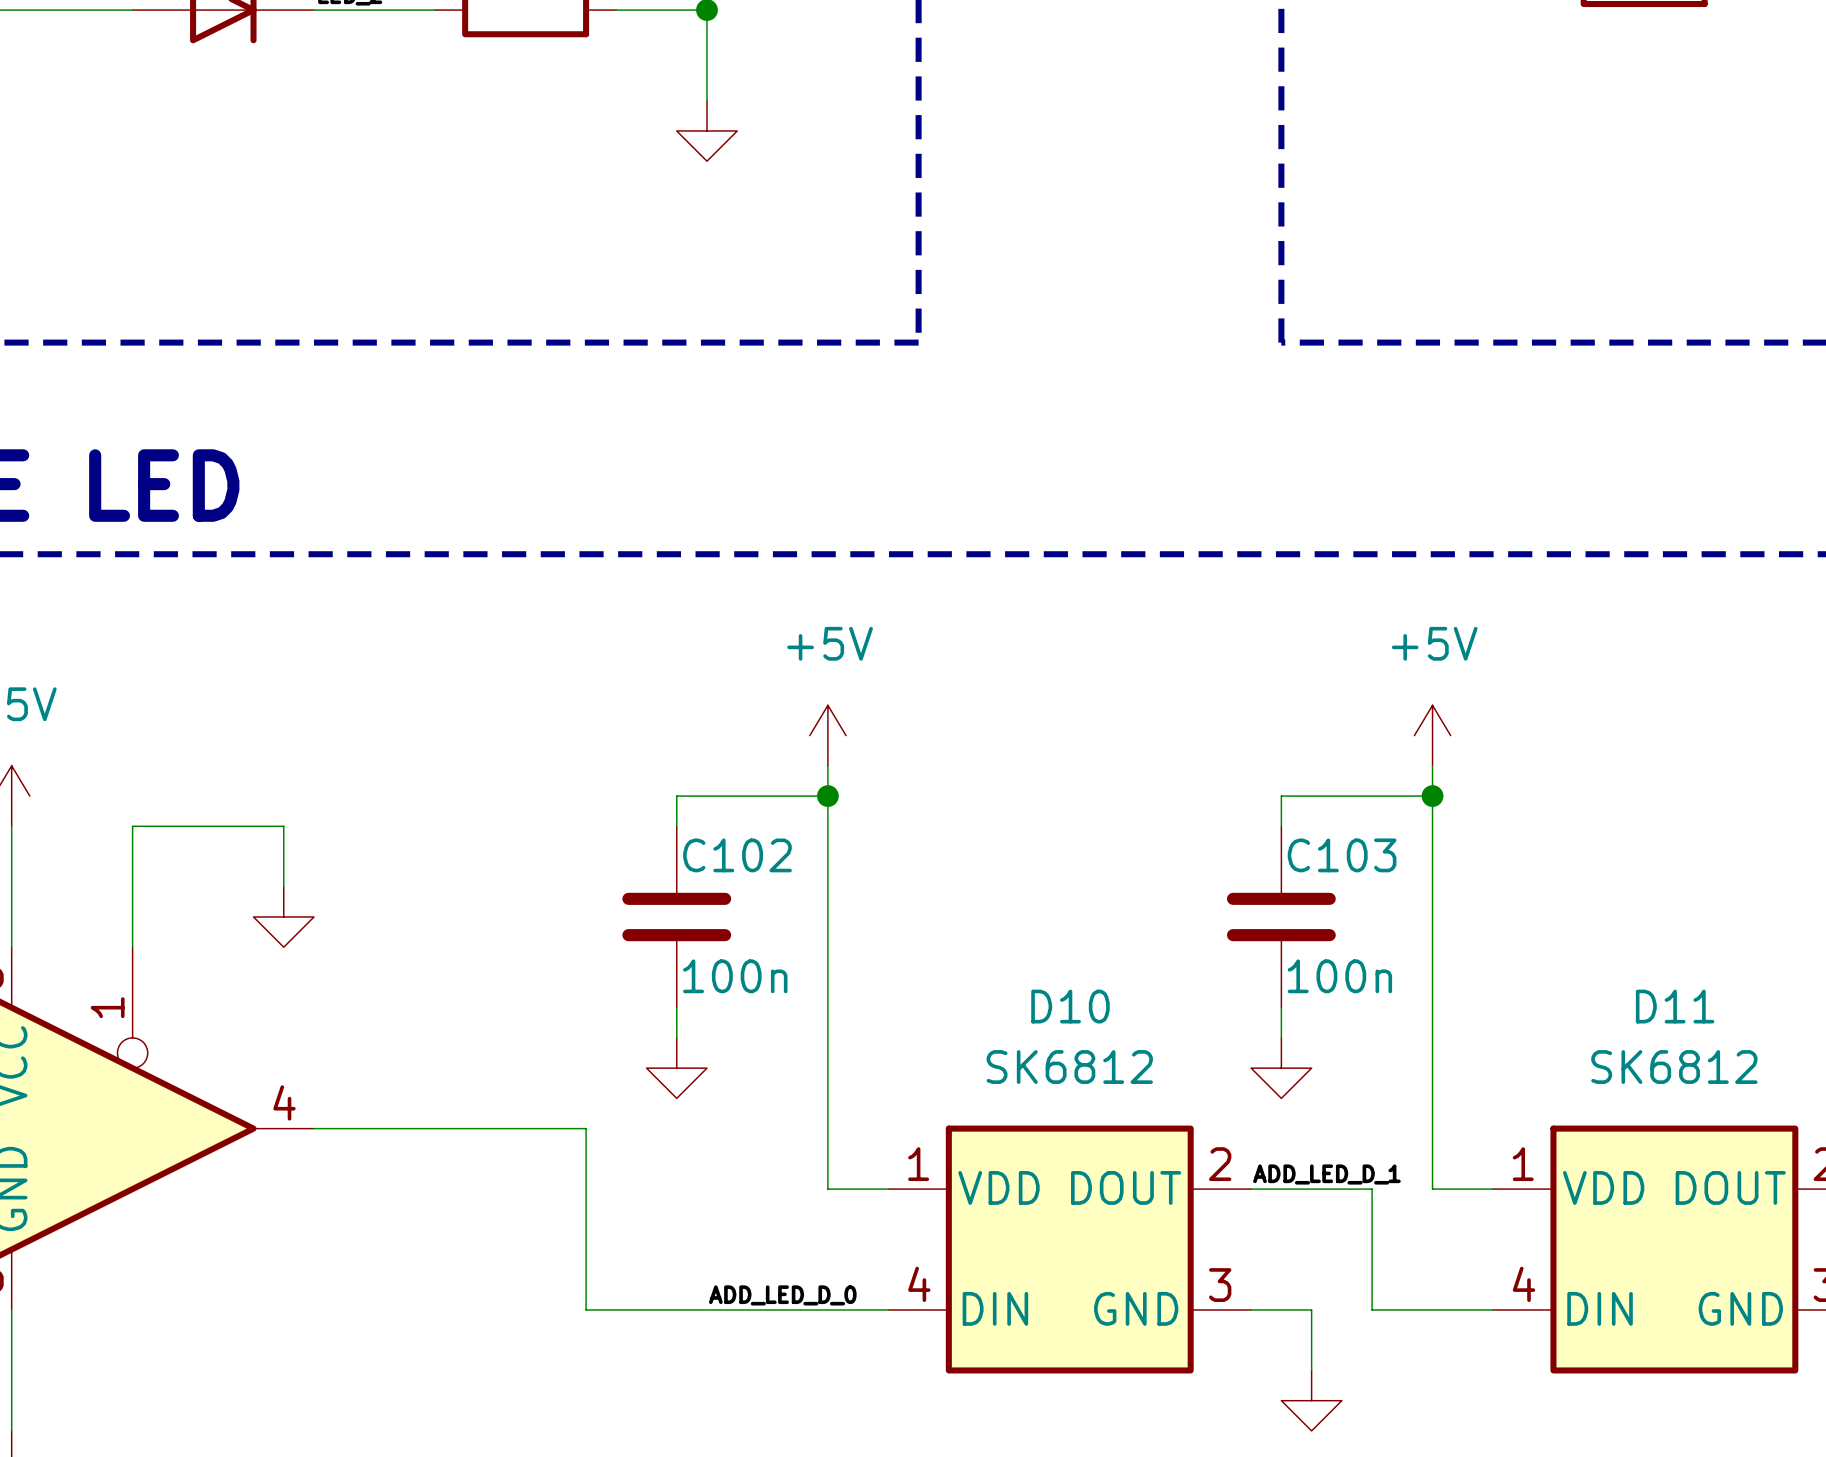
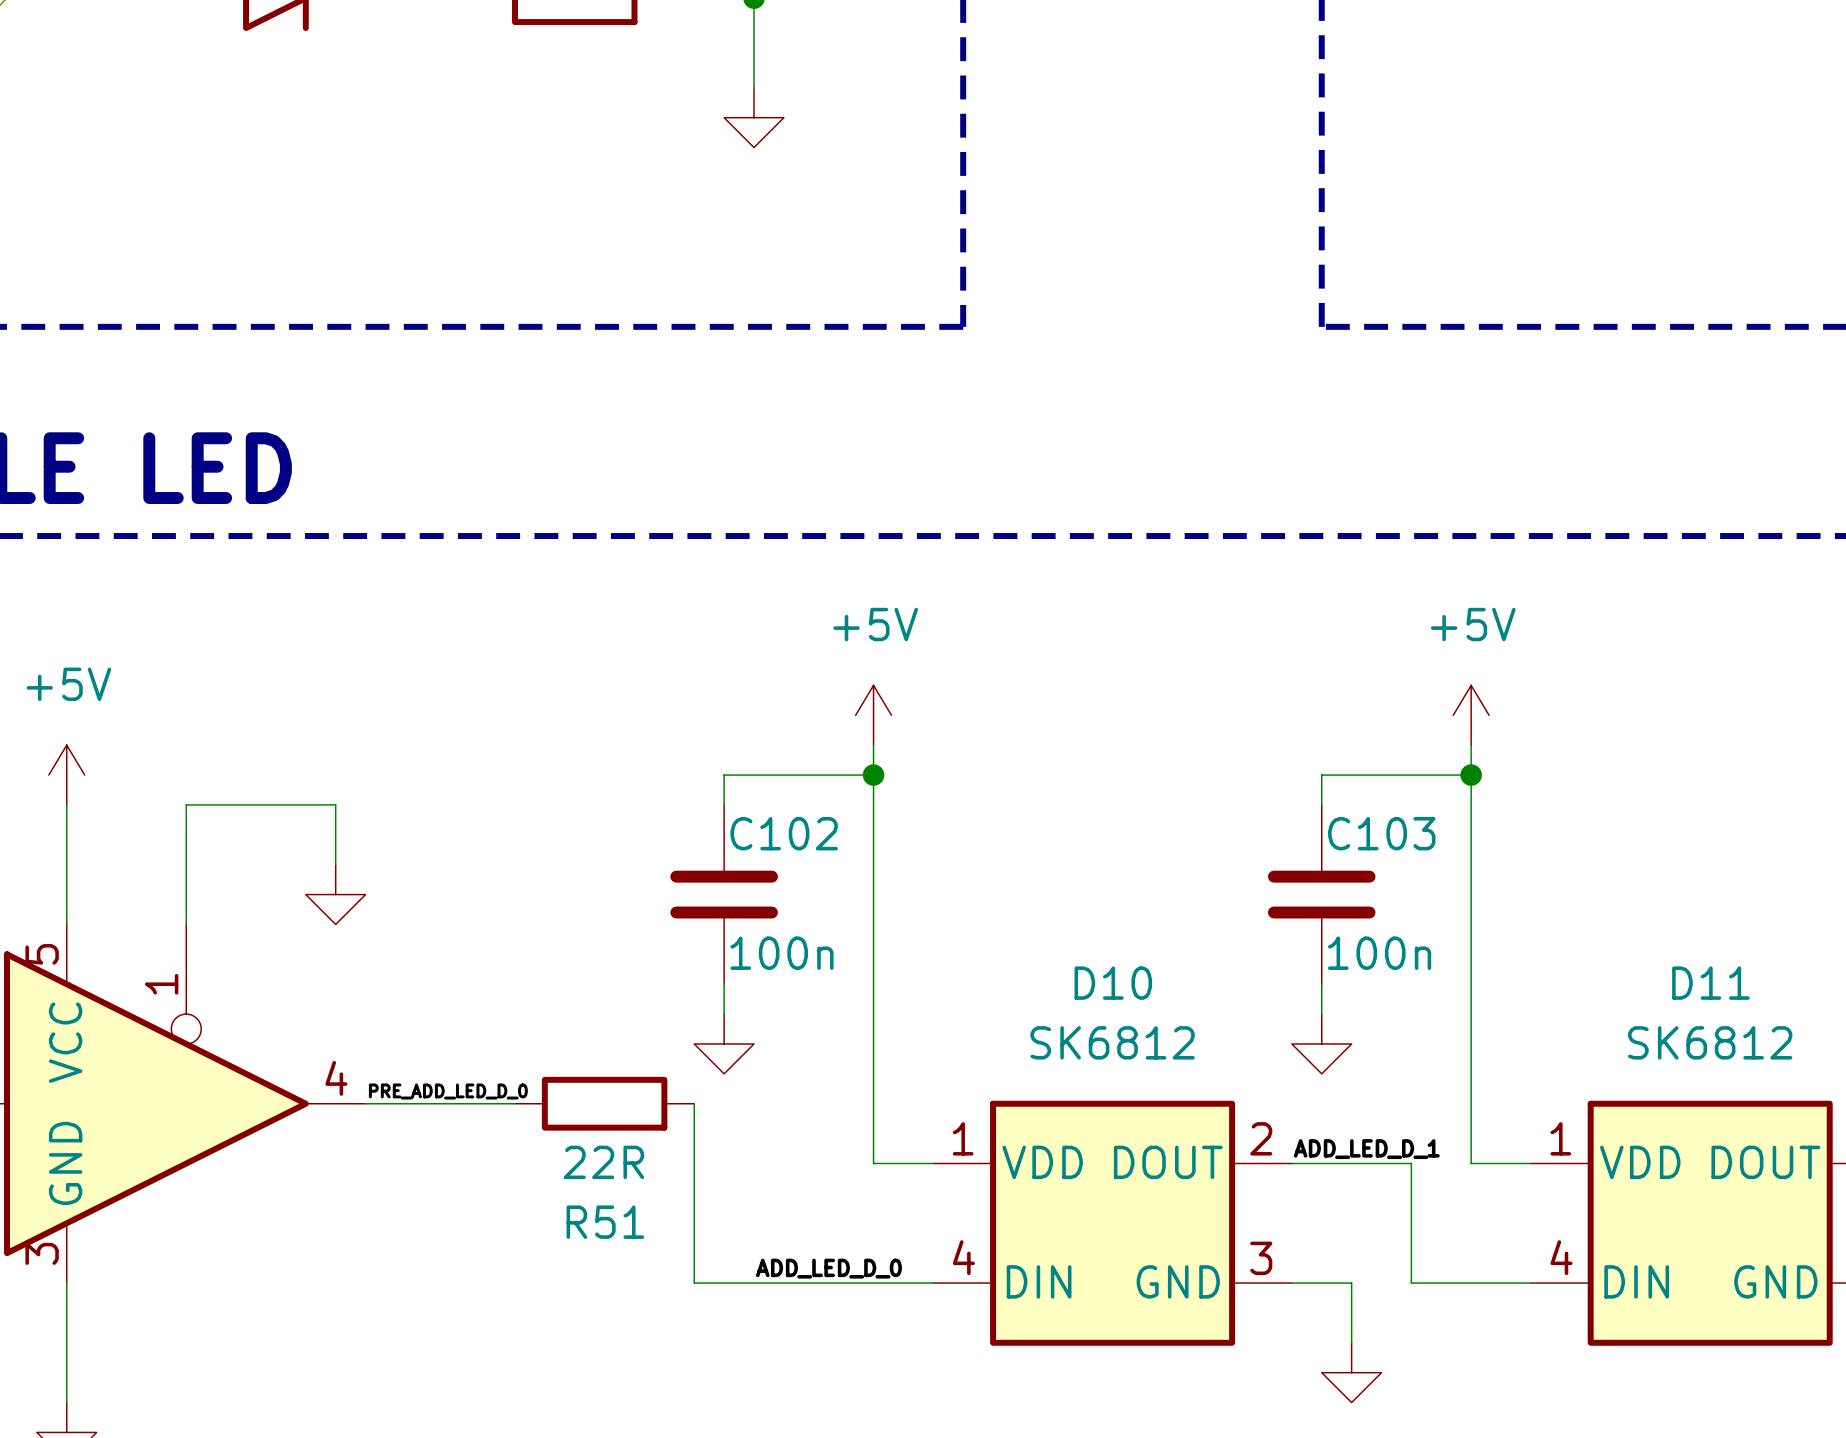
label: none -> PRE_ADD_LED_D_0 (448, 1091)
wire: (465, 1128) (586, 1128) (586, 1310) (646, 1310) -> (694, 1103) (694, 1283)
R51: none -> 22R (604, 1103)

